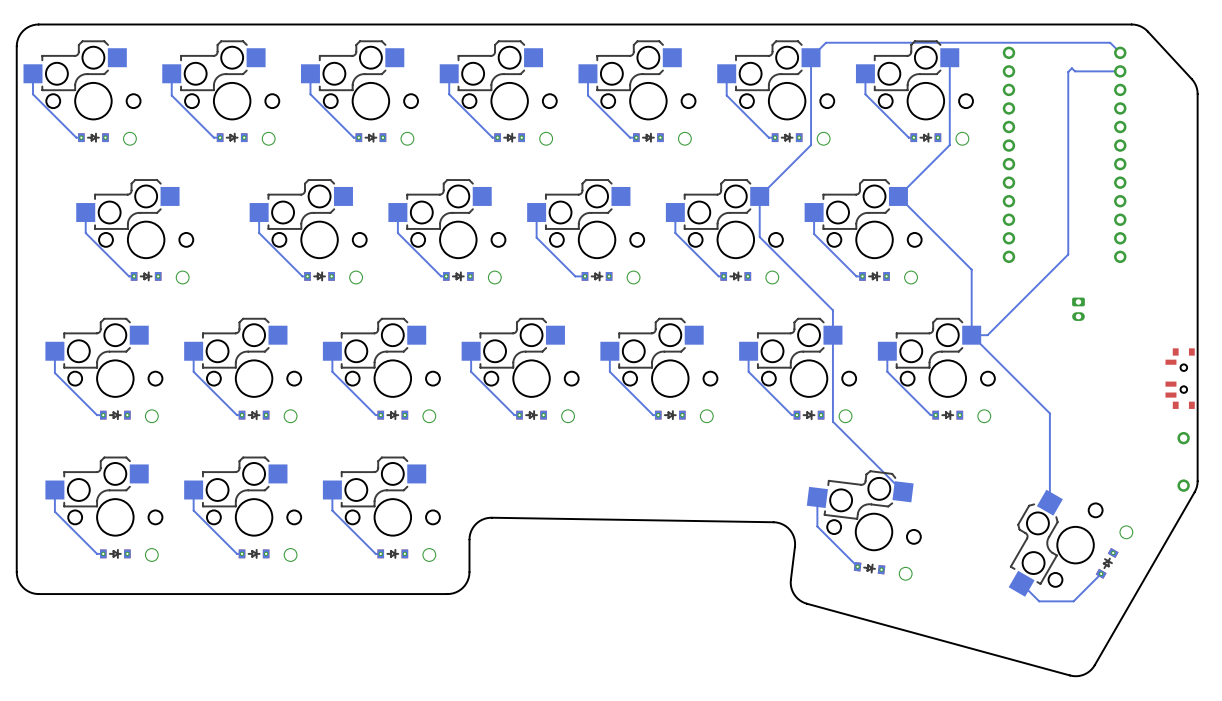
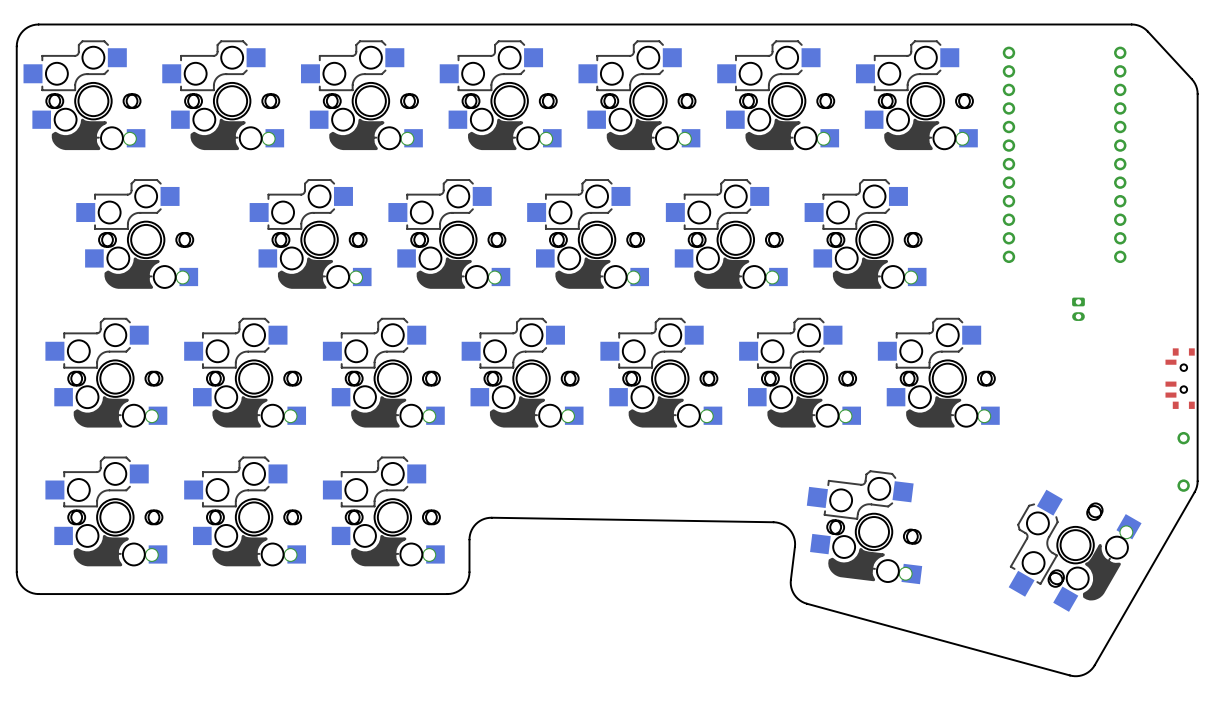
bottom track: (1120, 52) (1110, 42) (826, 42) (811, 57) (811, 145) (759, 196) (759, 237) (832, 310) (832, 421) (903, 491) -> none
bottom track: (949, 57) (949, 145) (898, 196) (971, 269) (971, 335) -> none
bottom track: (1120, 71) (1074, 71) (1071, 68) (1068, 71) (1068, 254) (987, 335) (971, 335) -> none
bottom track: (33, 73) (33, 94) (76, 137) (81, 137) -> none
bottom track: (171, 73) (171, 95) (213, 137) (220, 137) -> none
bottom track: (310, 73) (310, 94) (353, 137) (358, 137) -> none
bottom track: (449, 73) (449, 94) (492, 137) (497, 137) -> none
bottom track: (587, 73) (587, 95) (630, 137) (636, 137) -> none
bottom track: (726, 73) (726, 95) (768, 137) (775, 137) -> none
bottom track: (865, 73) (865, 94) (908, 137) (913, 137) -> none
part: none -> (88, 118)
part: none -> (227, 118)
part: none -> (366, 118)
part: none -> (505, 118)
part: none -> (643, 118)
part: none -> (782, 118)
part: none -> (921, 118)
bottom track: (85, 212) (85, 233) (129, 276) (134, 276) -> none
bottom track: (259, 212) (259, 233) (302, 276) (307, 276) -> none
bottom track: (397, 212) (397, 233) (441, 276) (446, 276) -> none
bottom track: (536, 212) (536, 237) (575, 276) (585, 276) -> none
bottom track: (675, 212) (675, 233) (718, 276) (723, 276) -> none
bottom track: (814, 212) (814, 234) (856, 276) (862, 276) -> none
part: none -> (141, 256)
part: none -> (315, 256)
part: none -> (453, 256)
part: none -> (592, 256)
part: none -> (731, 256)
part: none -> (869, 256)
bottom track: (971, 335) (1049, 413) (1049, 502) -> none
bottom track: (54, 351) (54, 372) (97, 415) (103, 415) -> none
bottom track: (193, 351) (193, 371) (236, 415) (242, 415) -> none
bottom track: (332, 351) (332, 371) (375, 415) (380, 415) -> none
bottom track: (471, 351) (471, 371) (514, 415) (519, 415) -> none
bottom track: (609, 351) (609, 371) (653, 415) (658, 415) -> none
bottom track: (748, 351) (748, 371) (791, 415) (796, 415) -> none
bottom track: (887, 351) (887, 371) (930, 415) (935, 415) -> none
part: none -> (110, 395)
part: none -> (249, 395)
part: none -> (388, 395)
part: none -> (527, 395)
part: none -> (665, 395)
part: none -> (804, 395)
part: none -> (943, 395)
bottom track: (54, 489) (54, 511) (97, 553) (103, 553) -> none
bottom track: (193, 489) (193, 510) (236, 553) (242, 553) -> none
bottom track: (332, 489) (332, 510) (375, 553) (380, 553) -> none
bottom track: (817, 497) (817, 526) (857, 566) -> none
part: none -> (110, 534)
part: none -> (249, 534)
part: none -> (388, 534)
part: none -> (866, 550)
part: none -> (1095, 558)
bottom track: (1101, 573) (1073, 601) (1039, 601) (1021, 583) -> none

